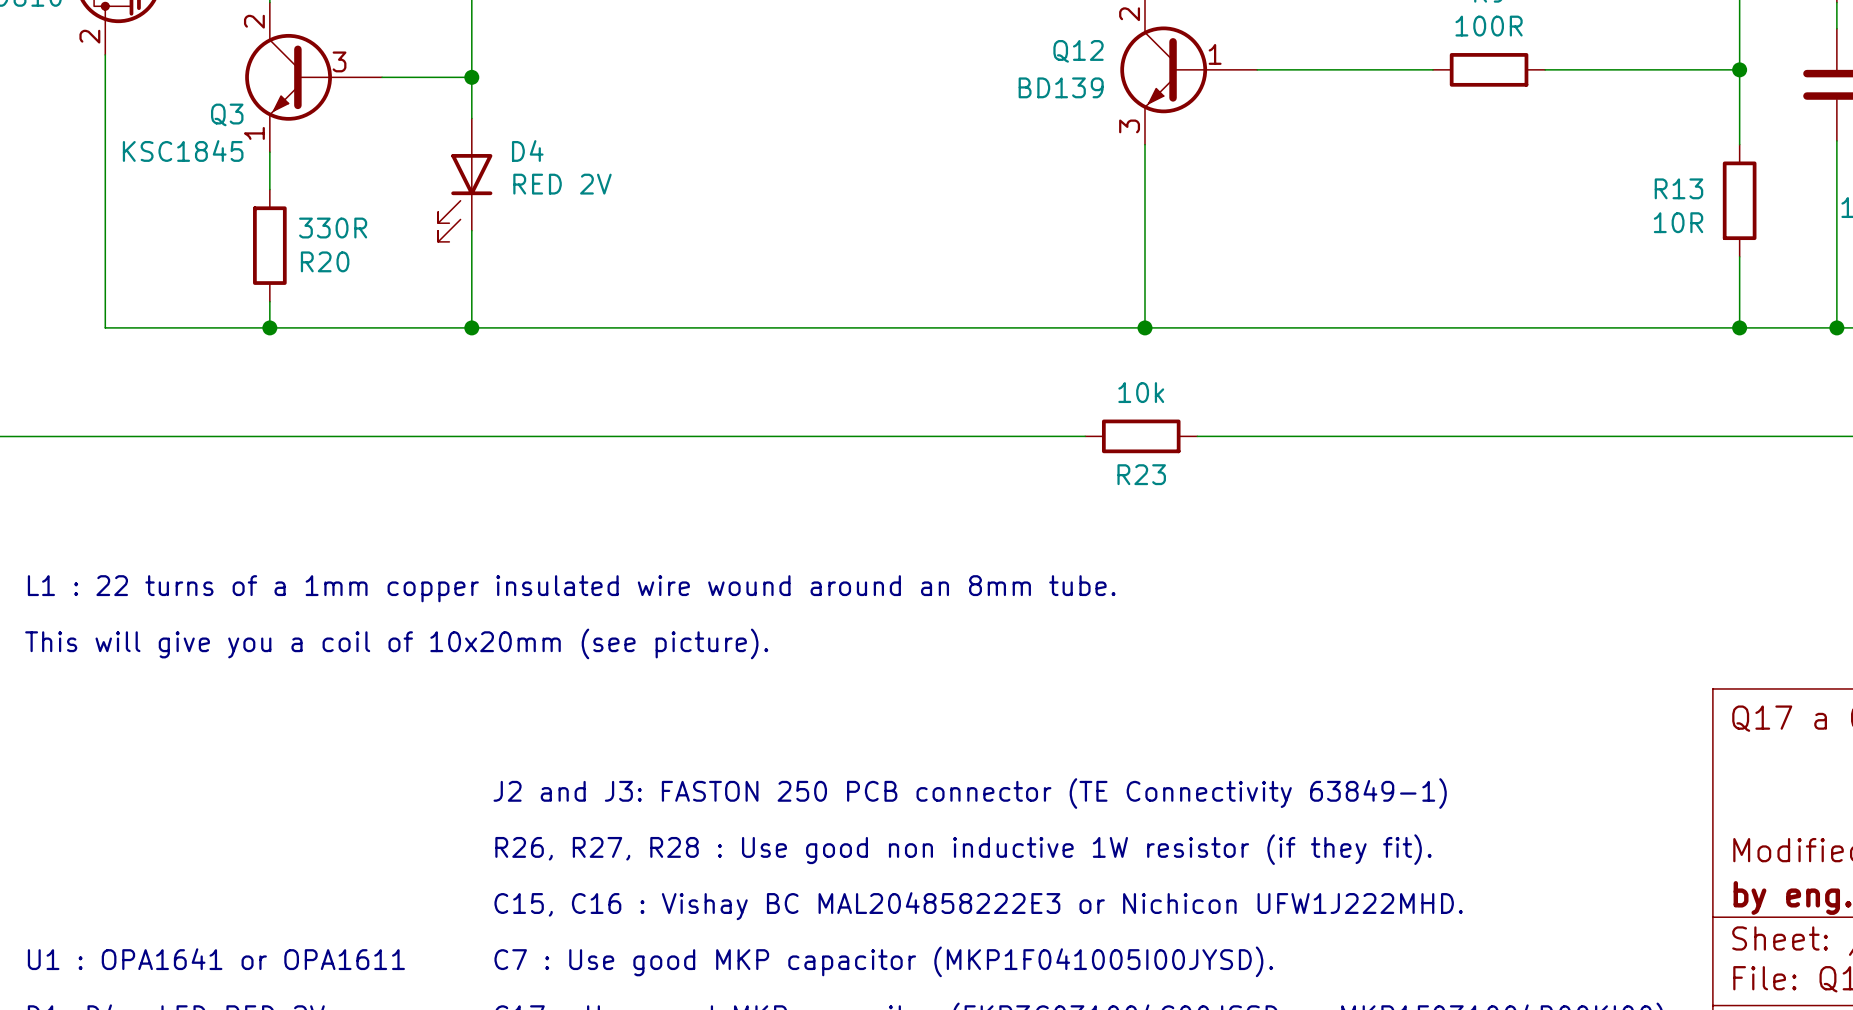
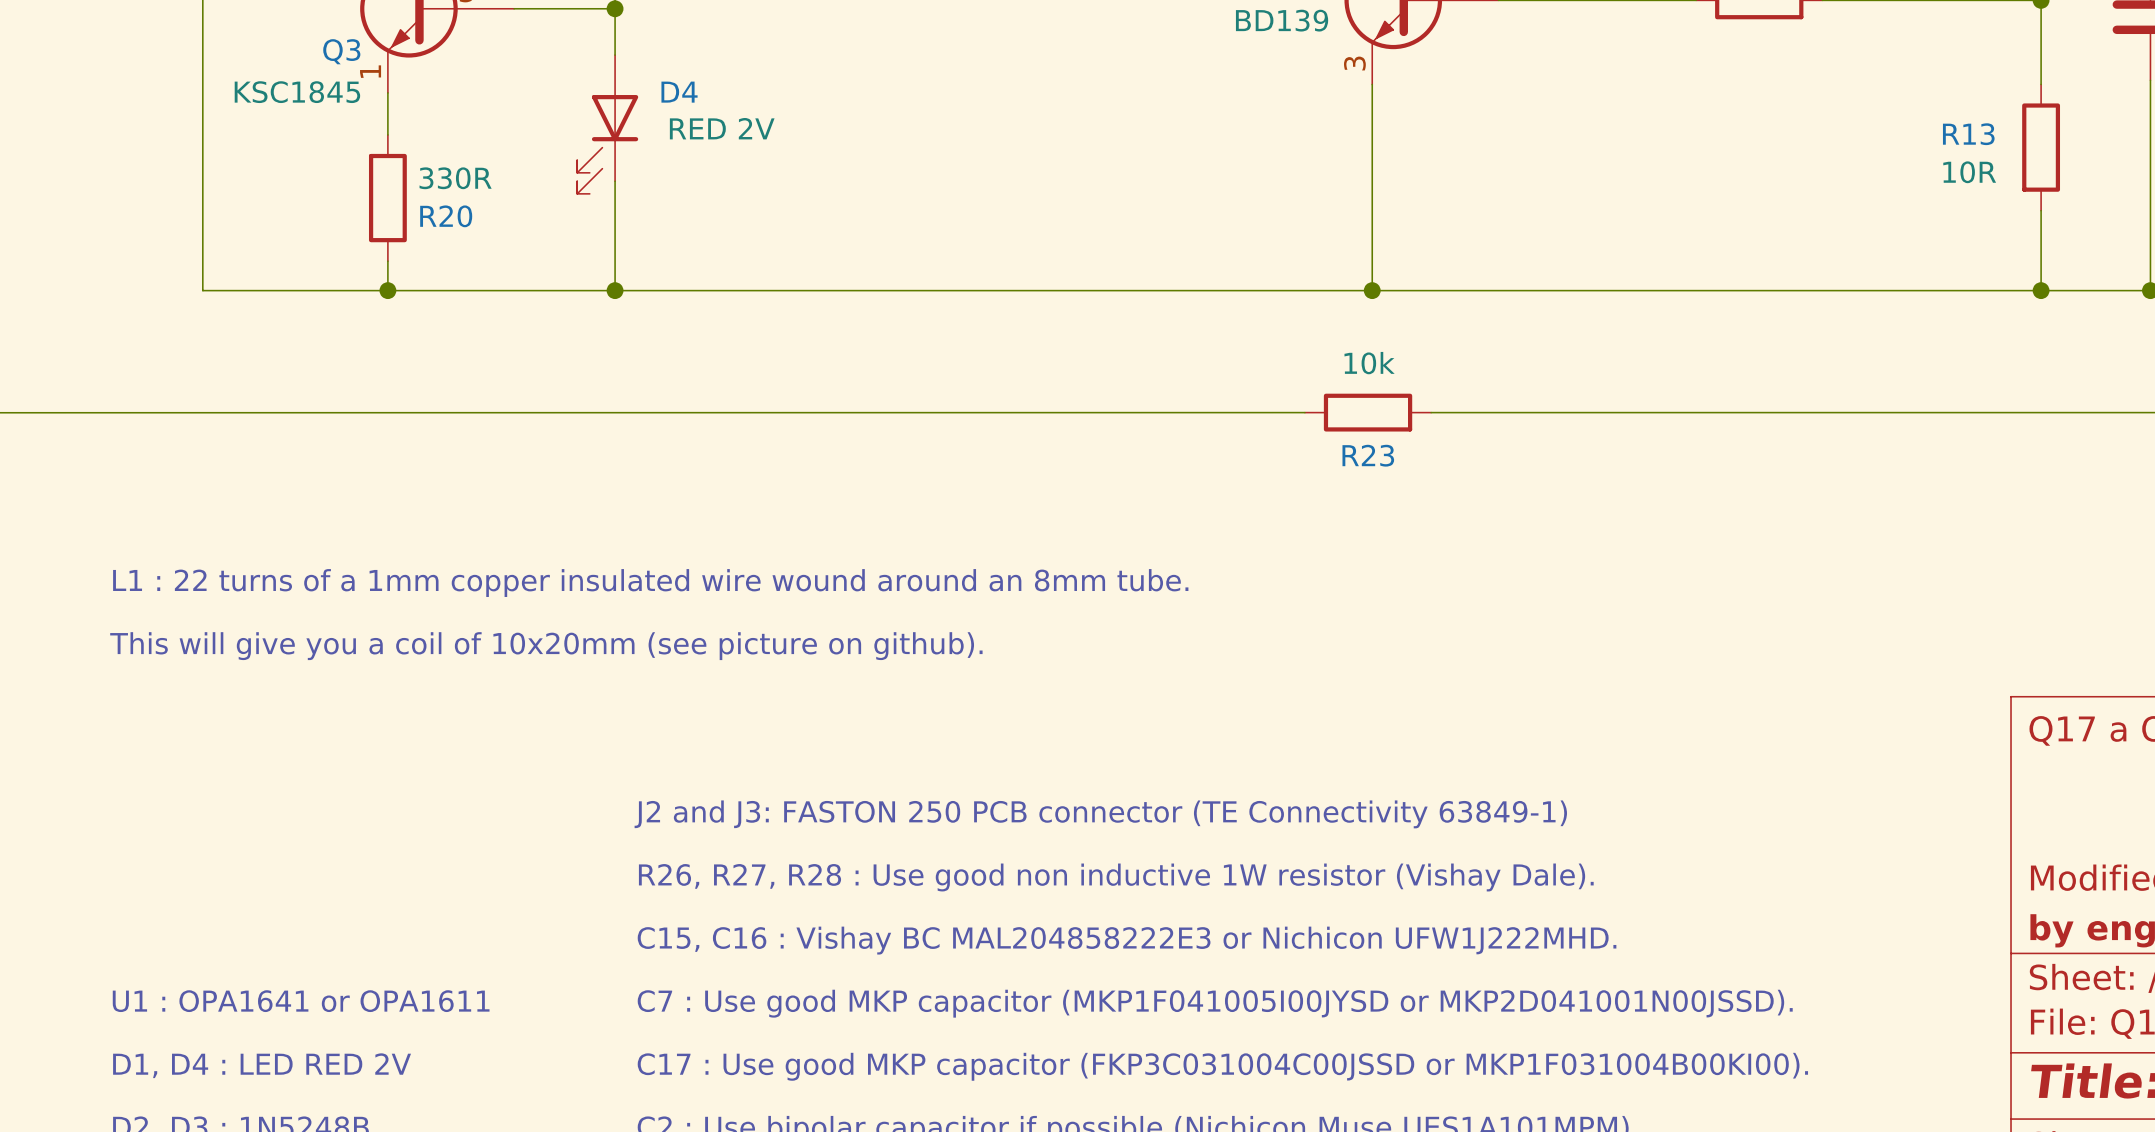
text: This will give you a coil of 10x20mm (see picture). (396, 643) -> This will give you a coil of 10x20mm (see picture on github). (546, 646)
text: R26, R27, R28 : Use good non inductive 1W resistor (if they fit). (963, 849) -> R26, R27, R28 : Use good non inductive 1W resistor (Vishay Dale). (1116, 877)
text: C7 : Use good MKP capacitor (MKP1F041005I00JYSD). (883, 961) -> C7 : Use good MKP capacitor (MKP1F041005I00JYSD or MKP2D041001N00JSSD). (1215, 1003)

